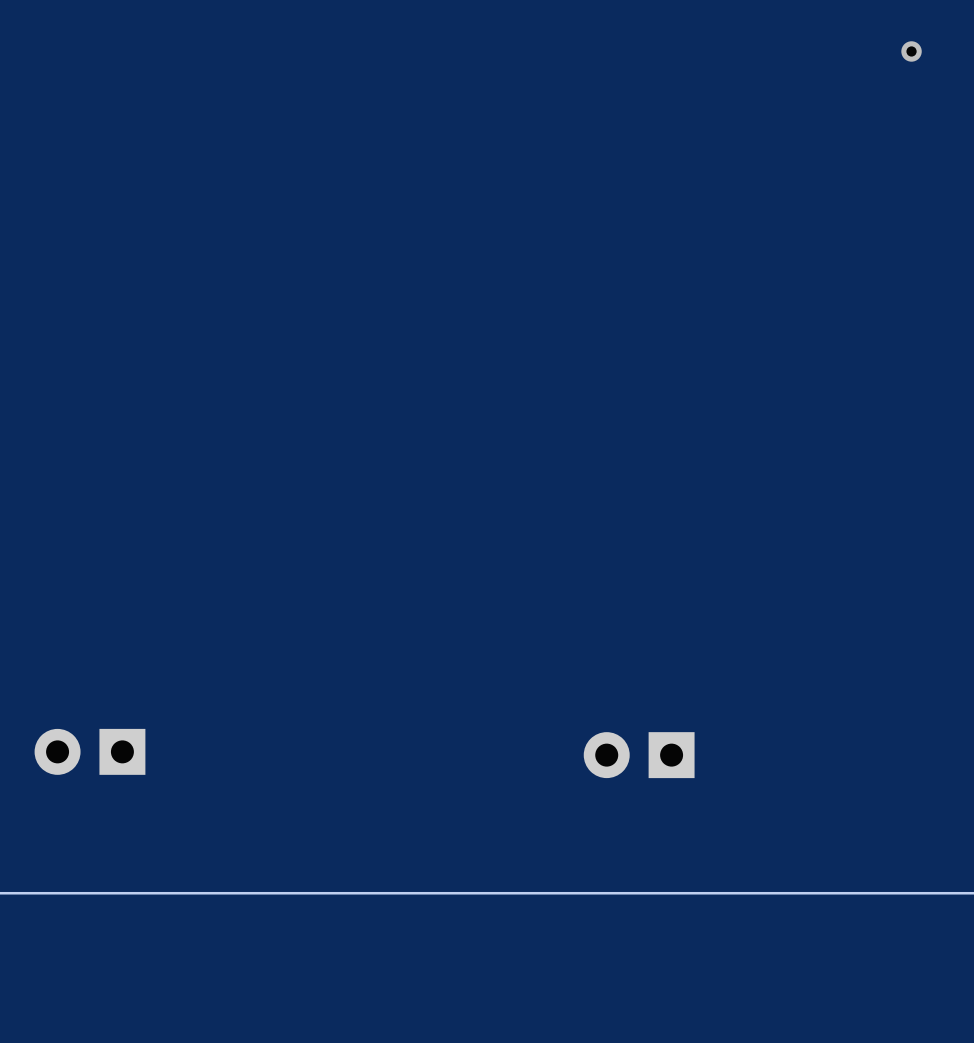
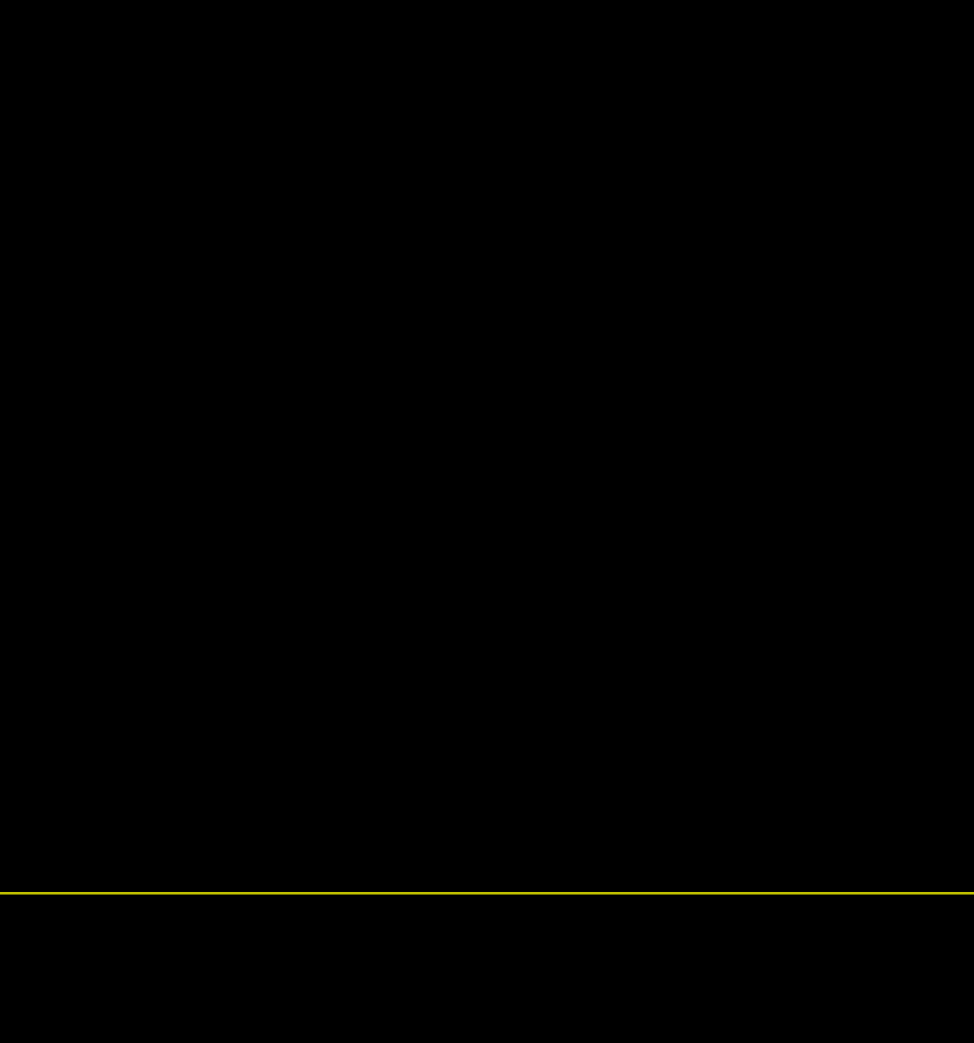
via: (911, 51) -> none
part: (89, 751) -> none
part: (639, 755) -> none

